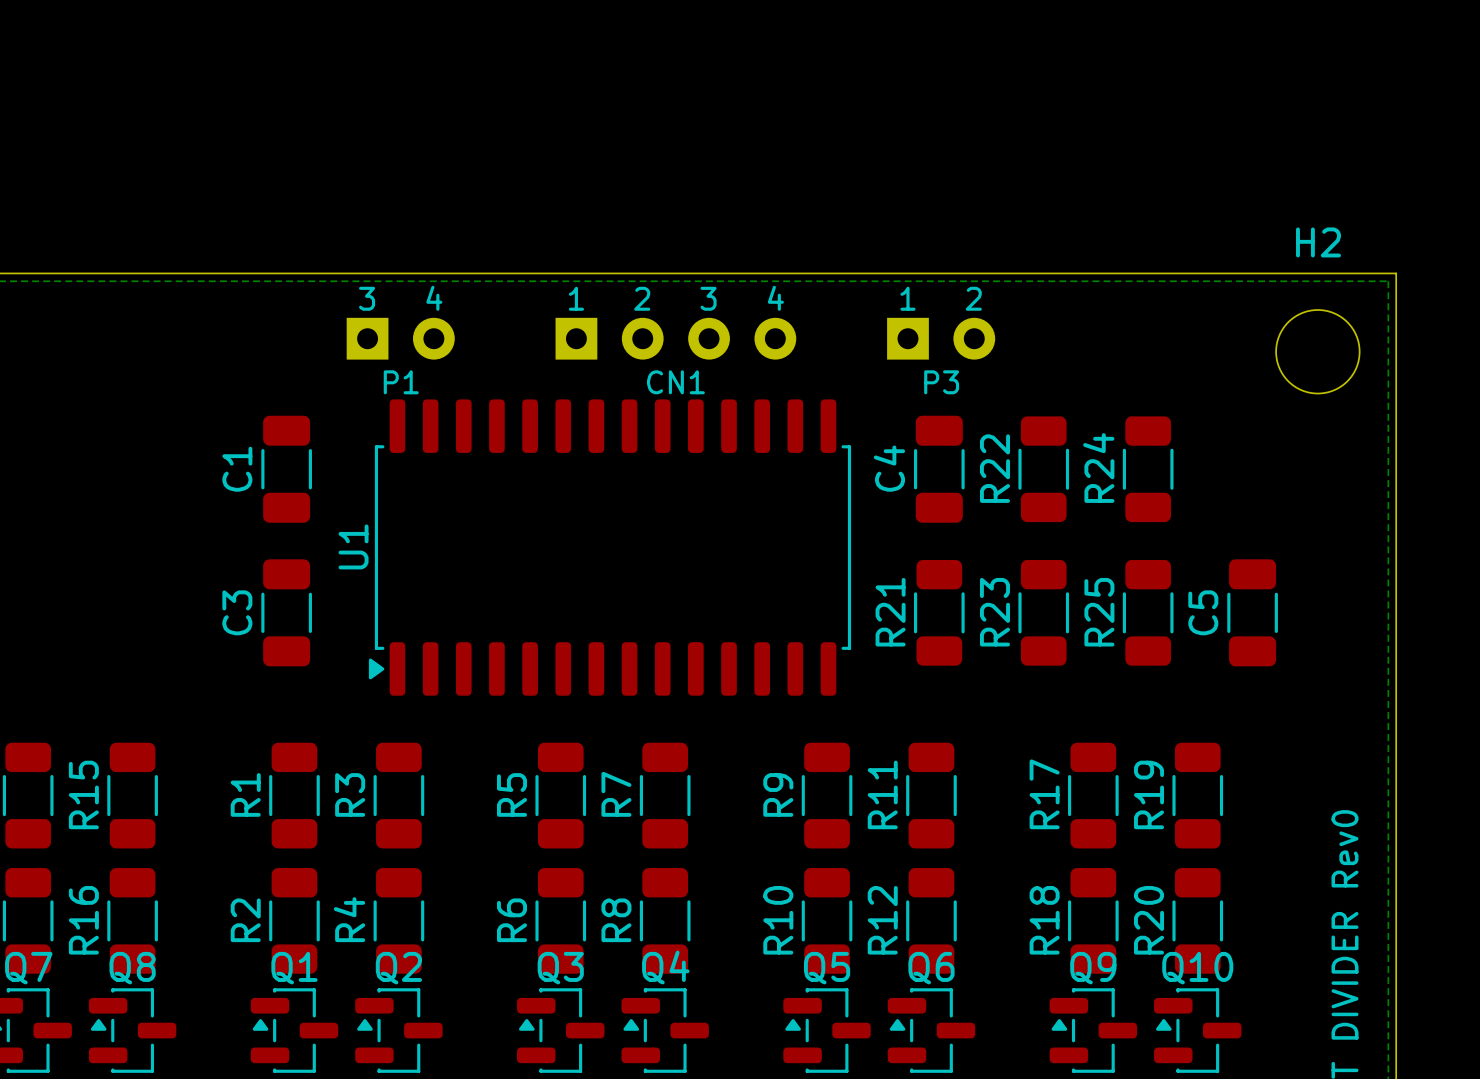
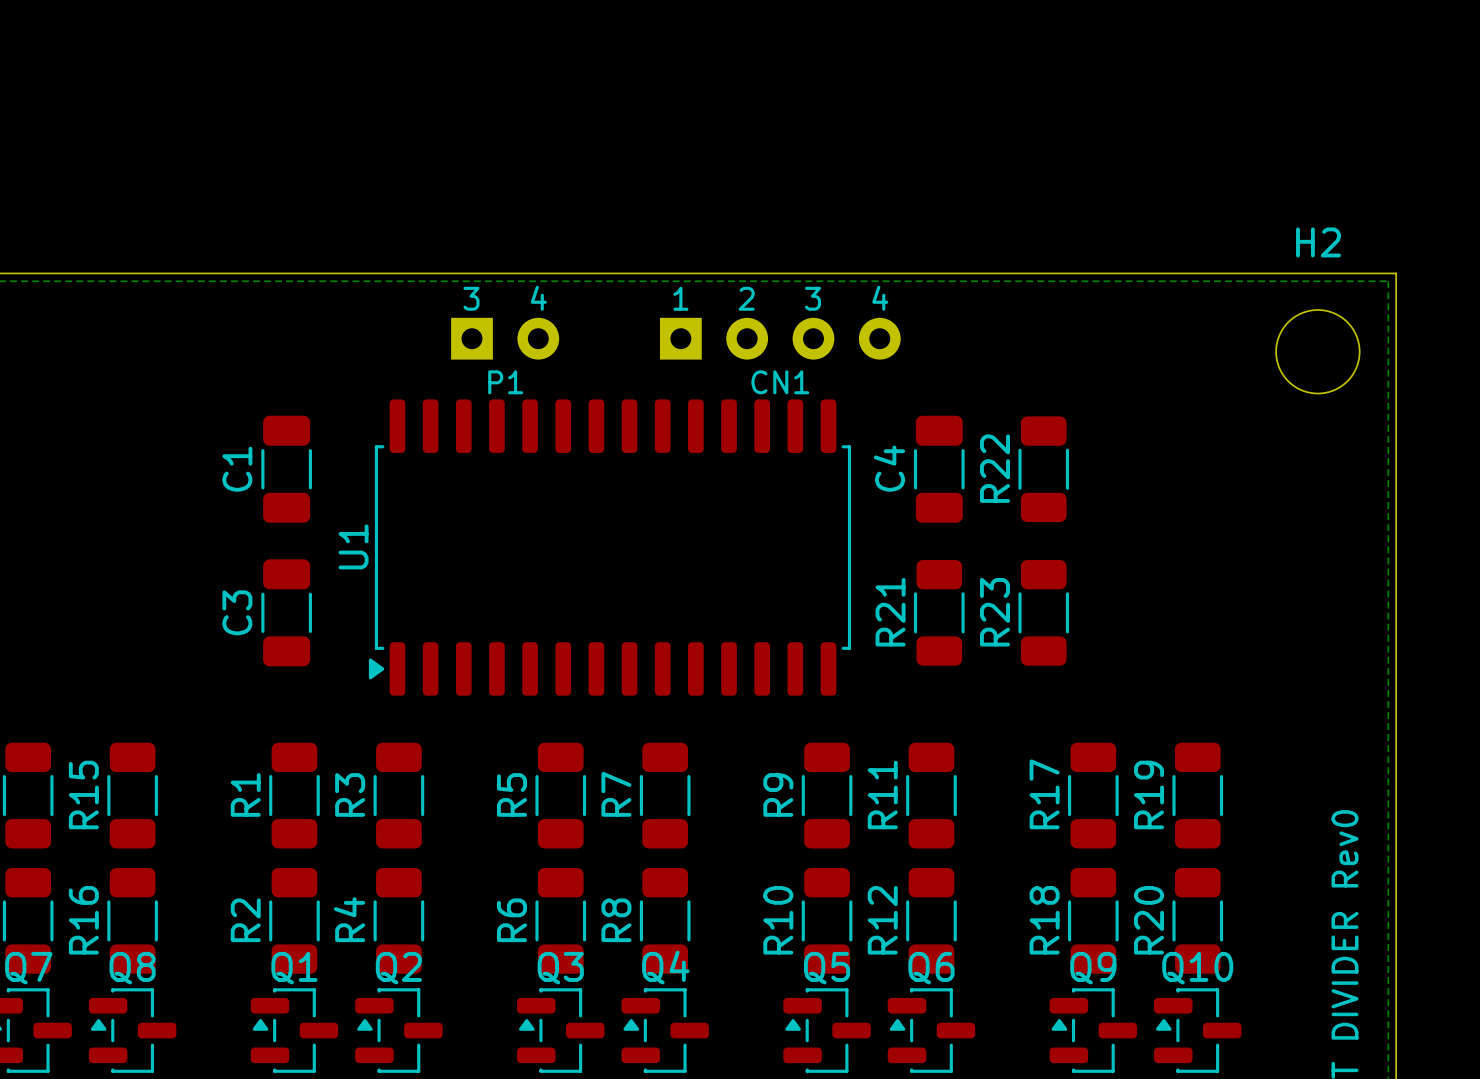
part position: (400, 338) -> (505, 338)
part position: (675, 338) -> (780, 338)
part: (941, 338) -> none
R24: (1148, 469) -> none
R25: (1148, 612) -> none
C5: (1252, 612) -> none

